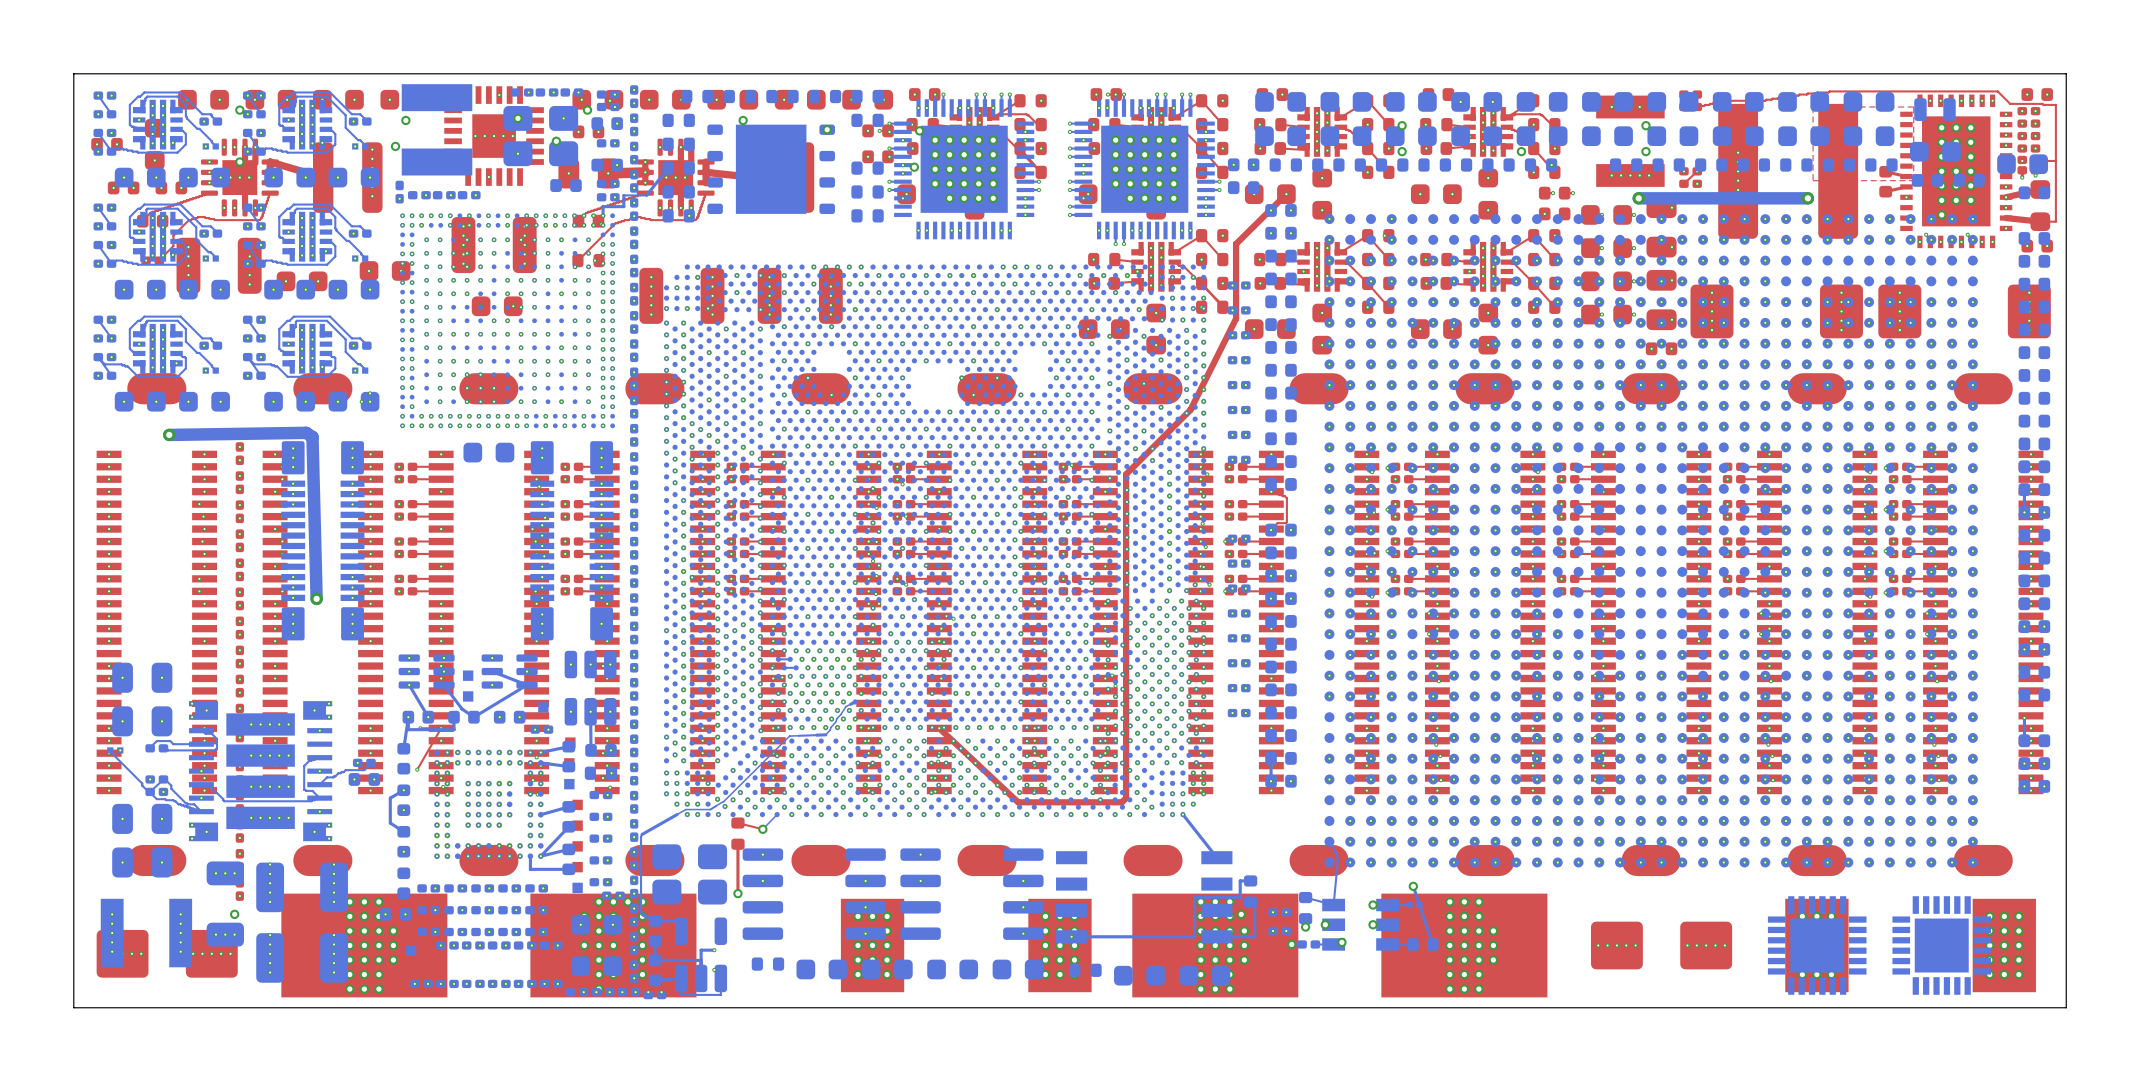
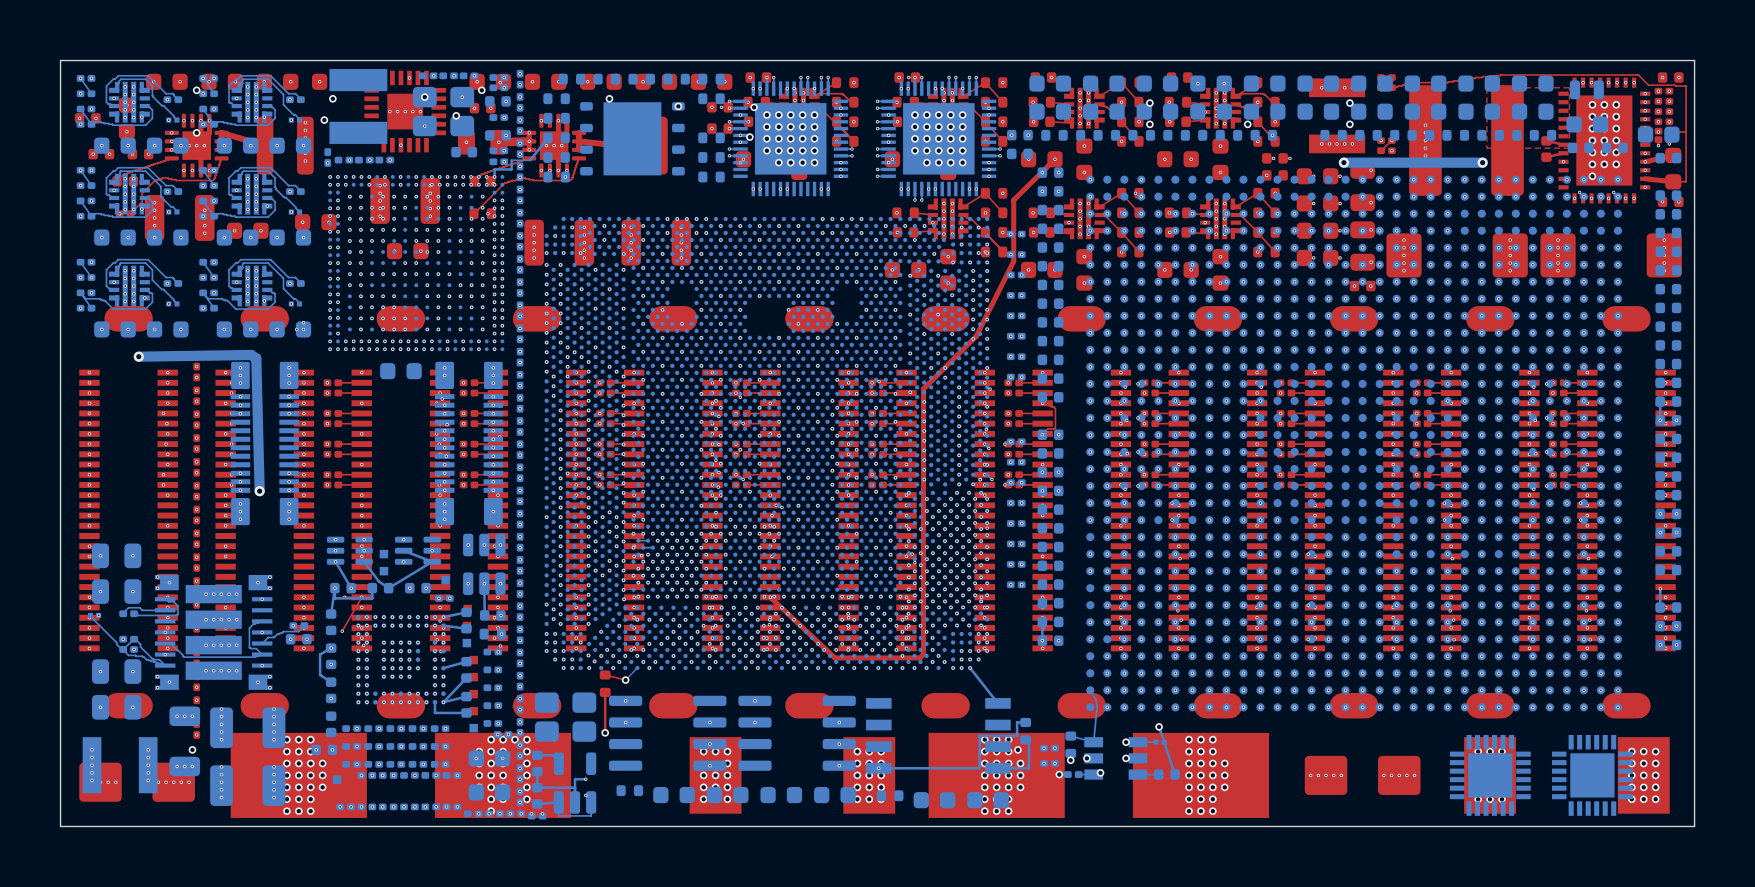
bottom track: (855, 701) (845, 706) (825, 734) (789, 736) (723, 801) (710, 809) (685, 809) (642, 834) (641, 912) (655, 921) -> none

